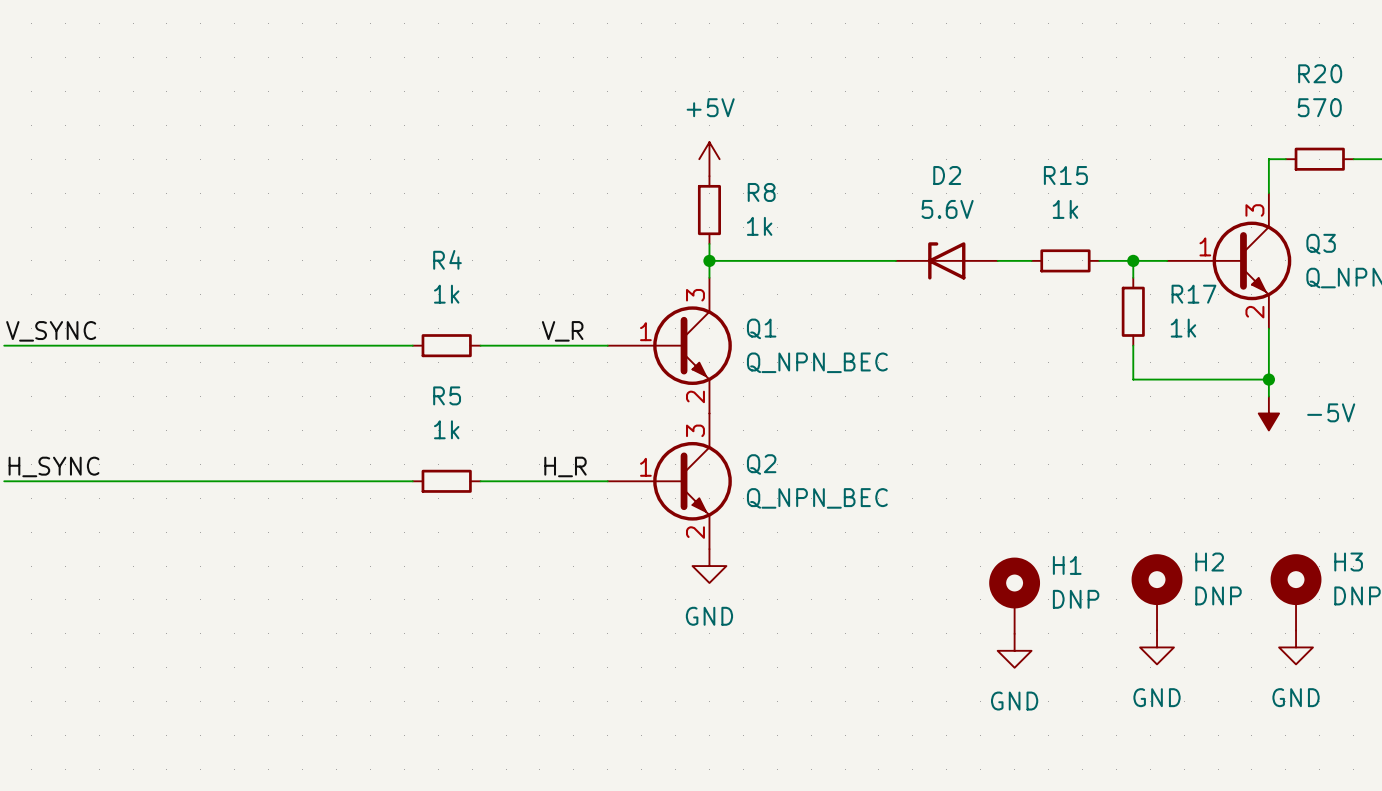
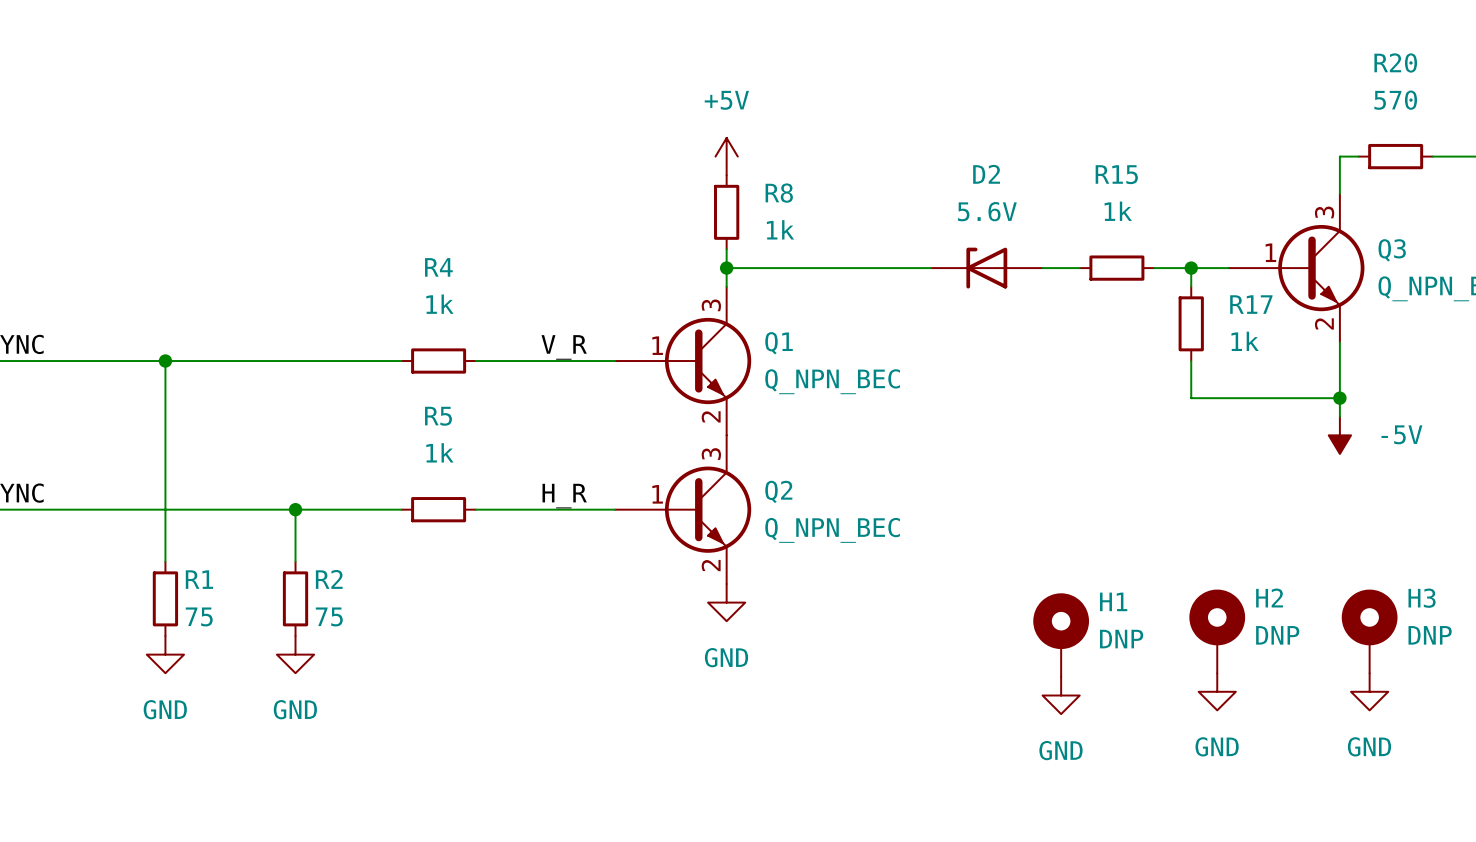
wire: none -> (165, 361) (165, 561)
junction: none -> (165, 361)
wire: none -> (295, 509) (295, 561)
junction: none -> (295, 509)
R1: none -> 75 (165, 598)
R2: none -> 75 (295, 598)
power symbol: none -> GND (165, 654)
power symbol: none -> GND (295, 654)

